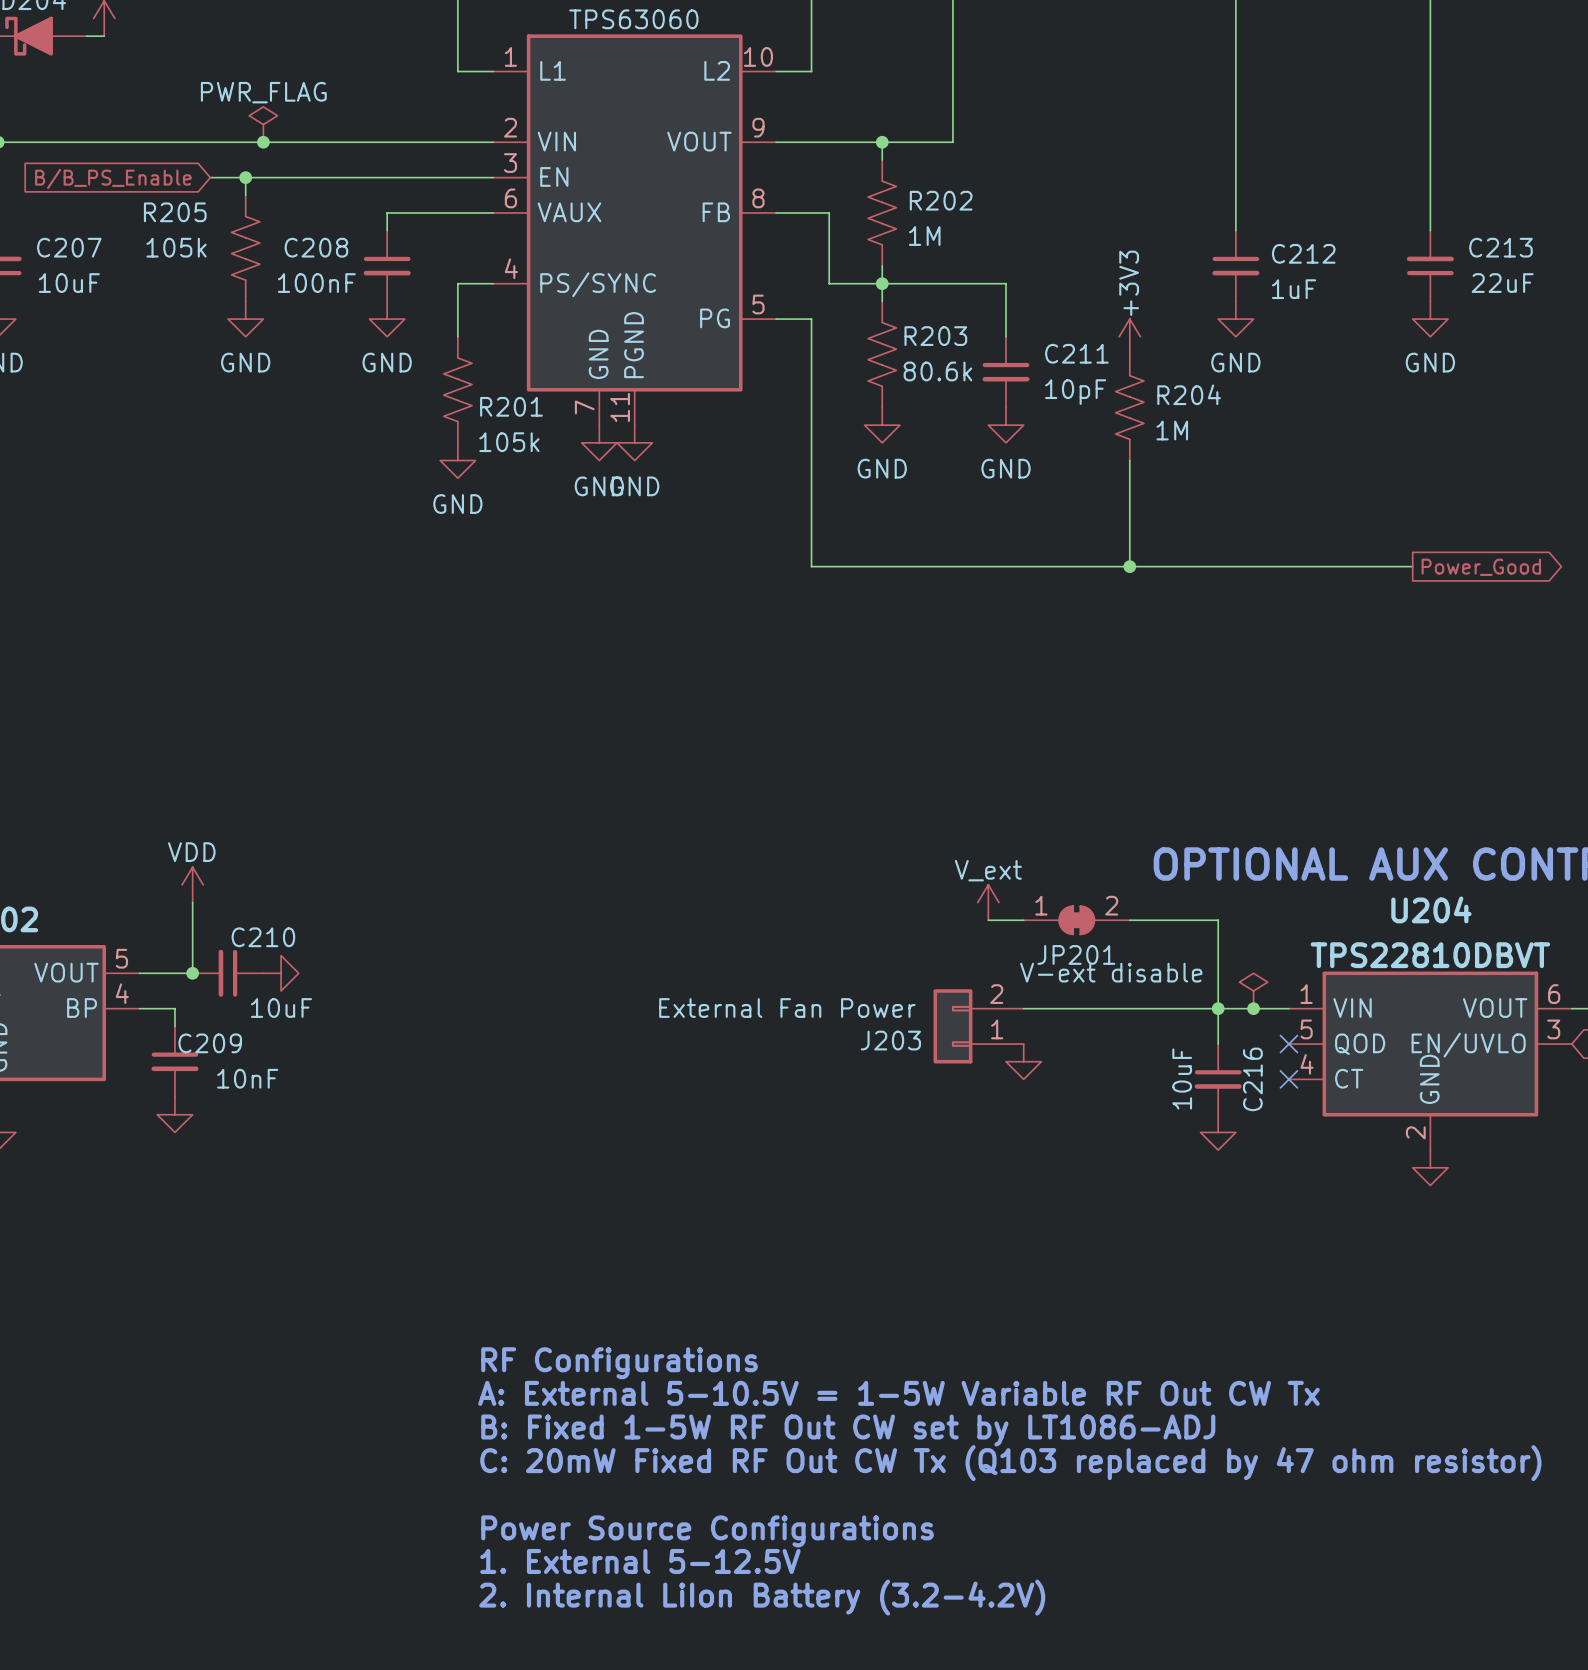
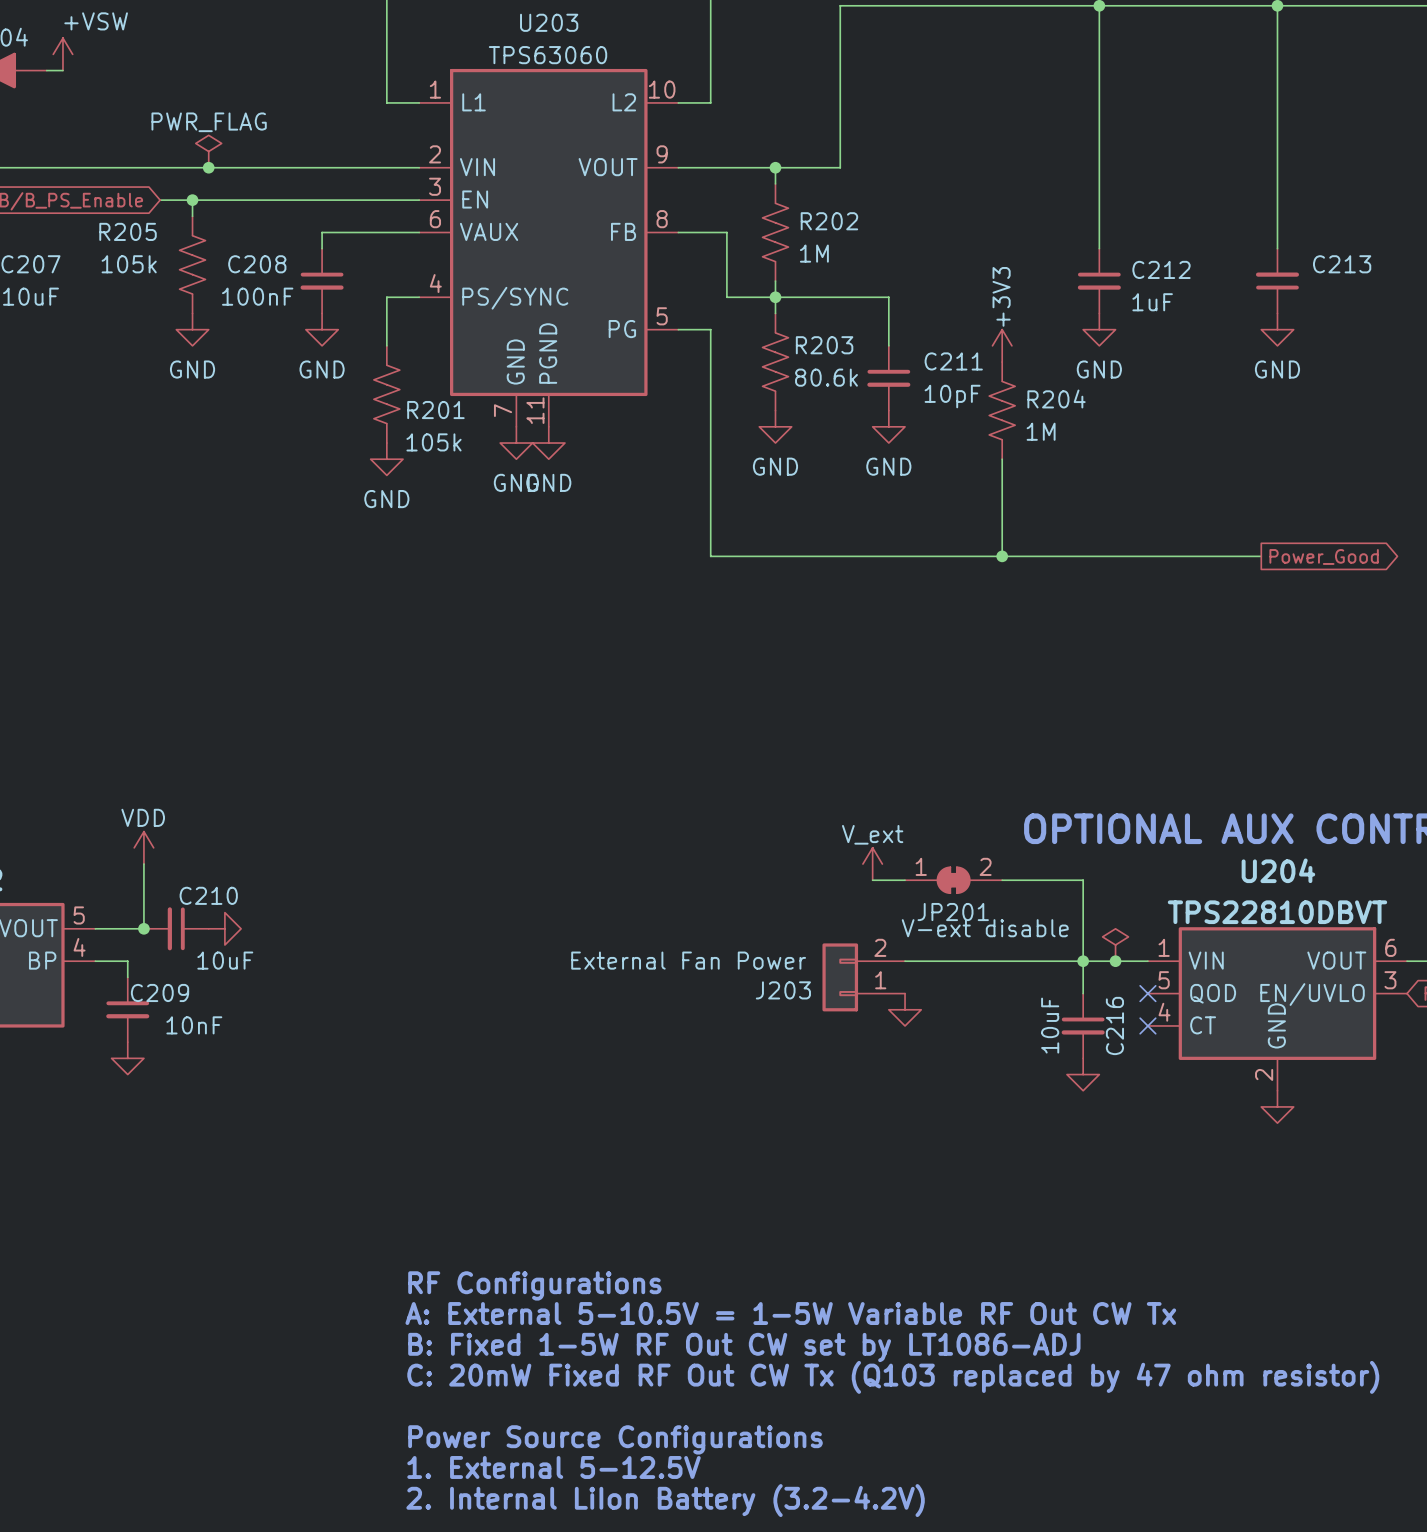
C213 value: 22uF (1502, 283) -> none

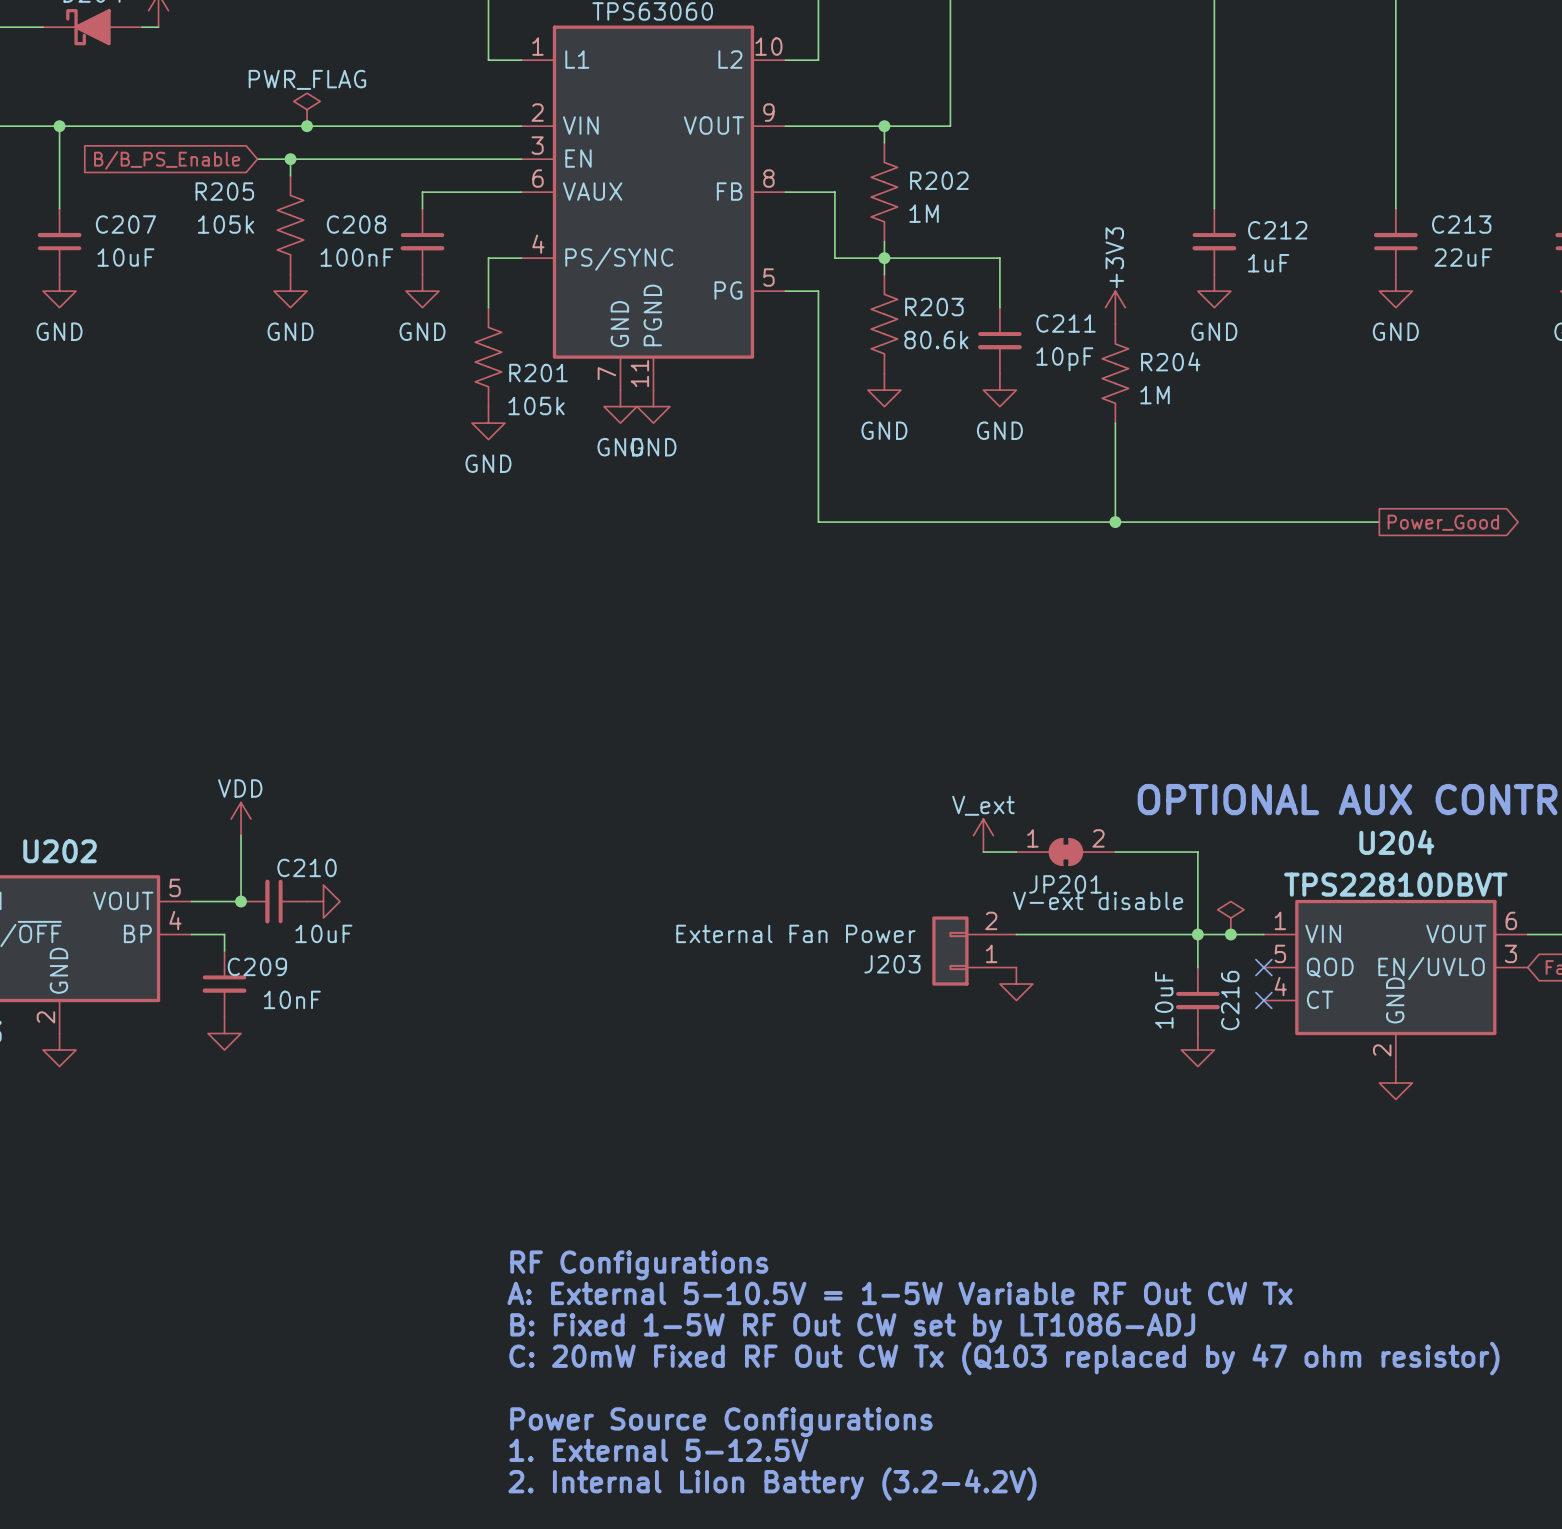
C213 value: none -> 22uF (1463, 257)

